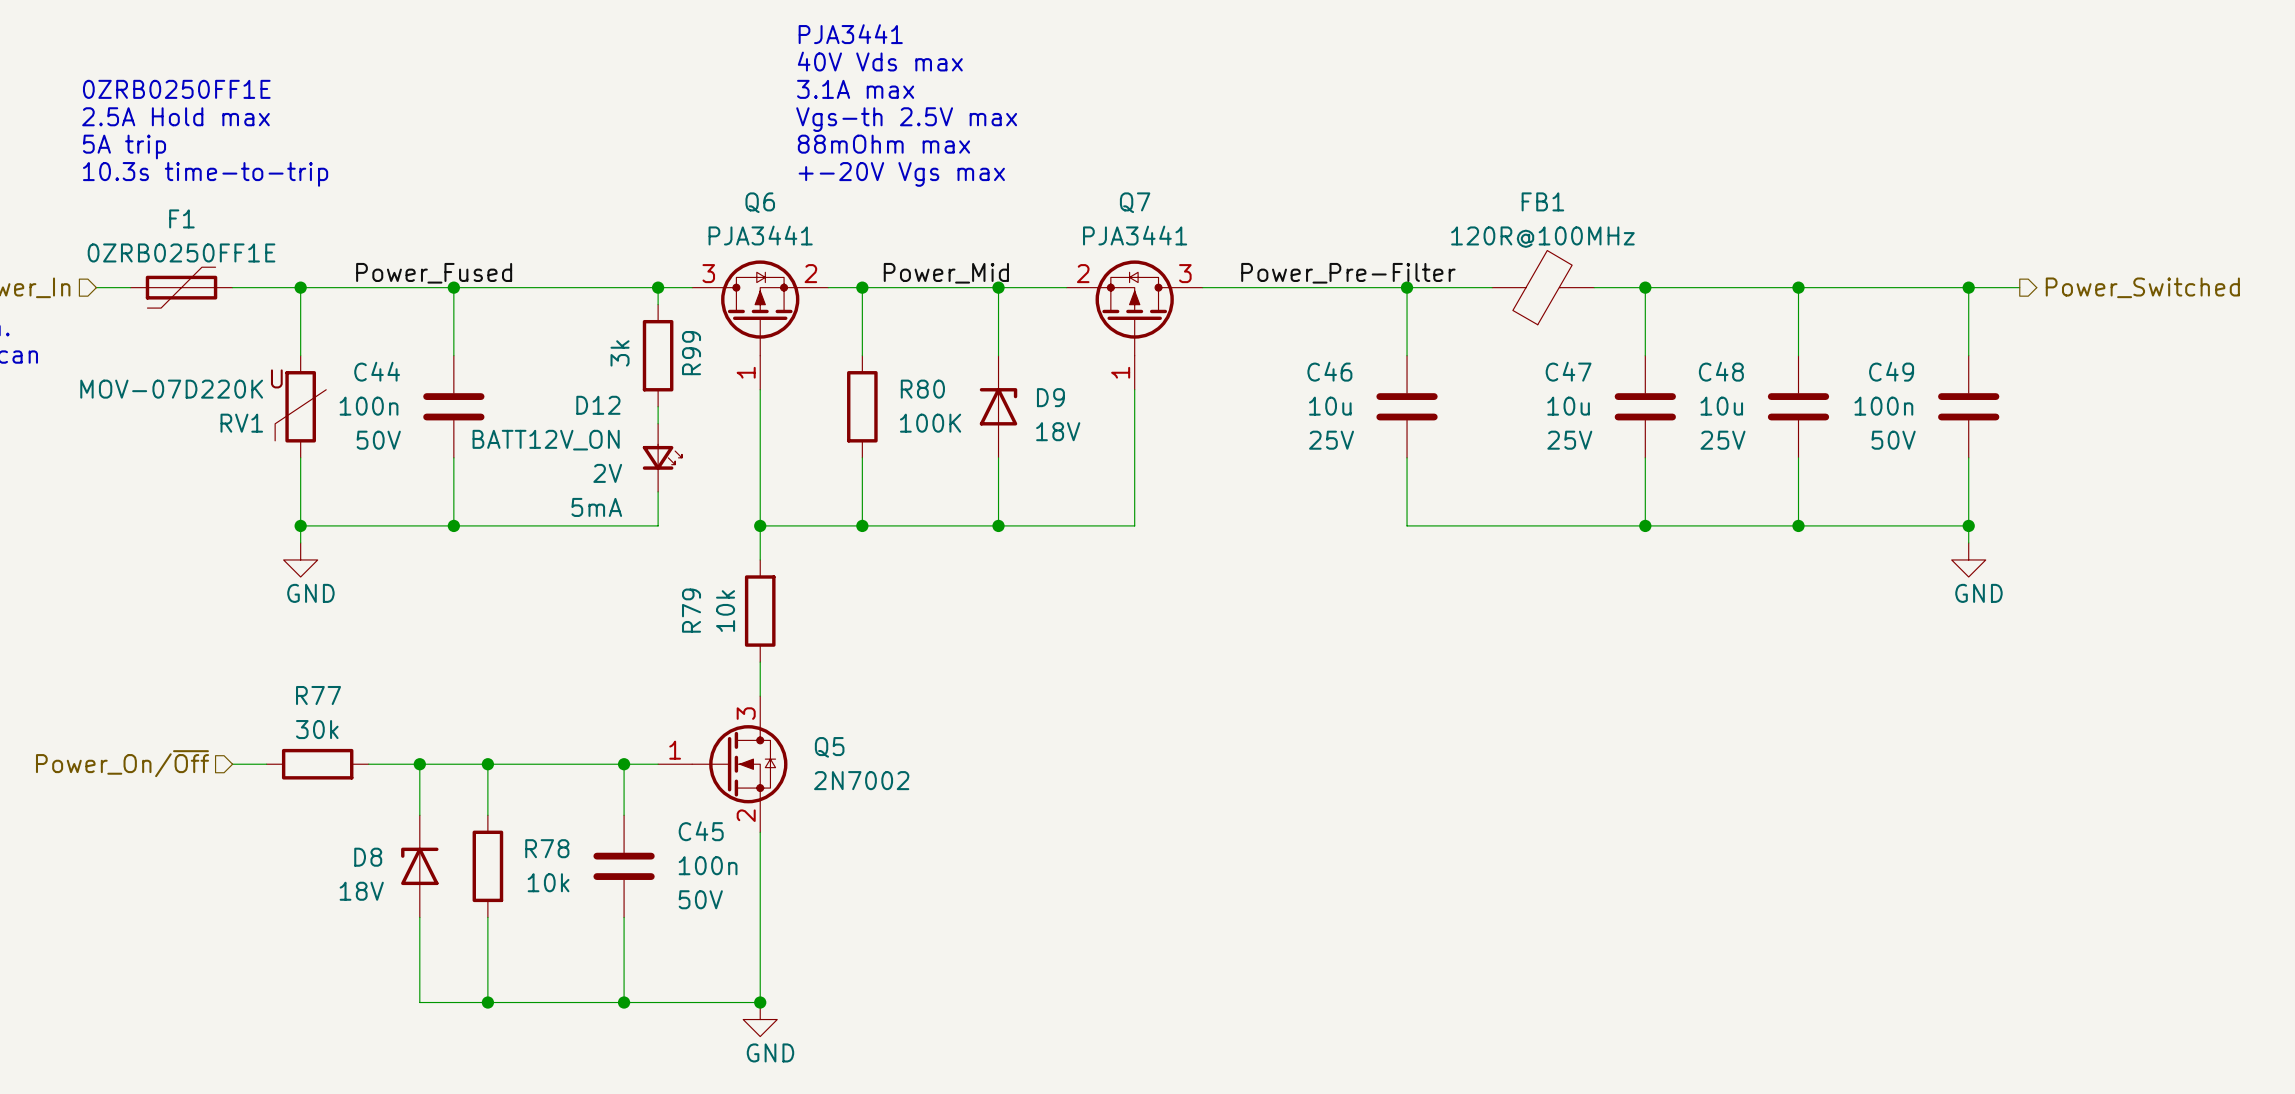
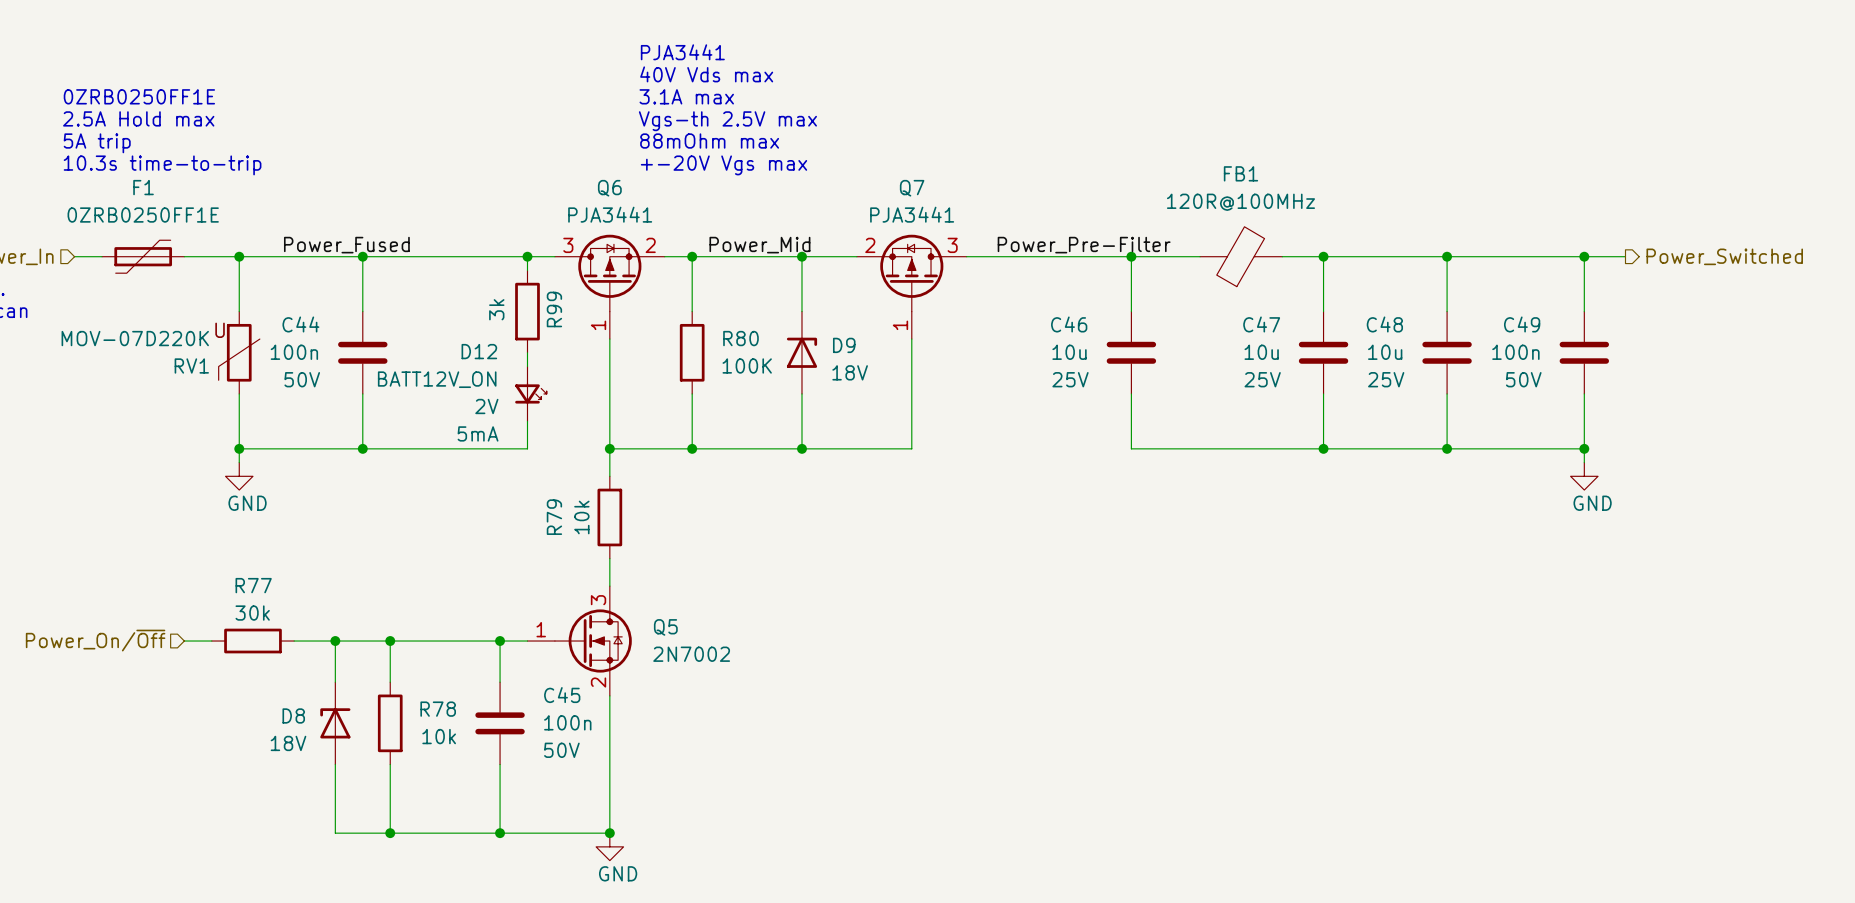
FB1 name position: FB1 (1542, 201) -> FB1 (1240, 173)
F1 name position: F1 (181, 218) -> F1 (143, 187)
FB1 value position: 120R@100MHz (1542, 237) -> 120R@100MHz (1240, 202)
F1 value position: 0ZRB0250FF1E (181, 252) -> 0ZRB0250FF1E (143, 215)

